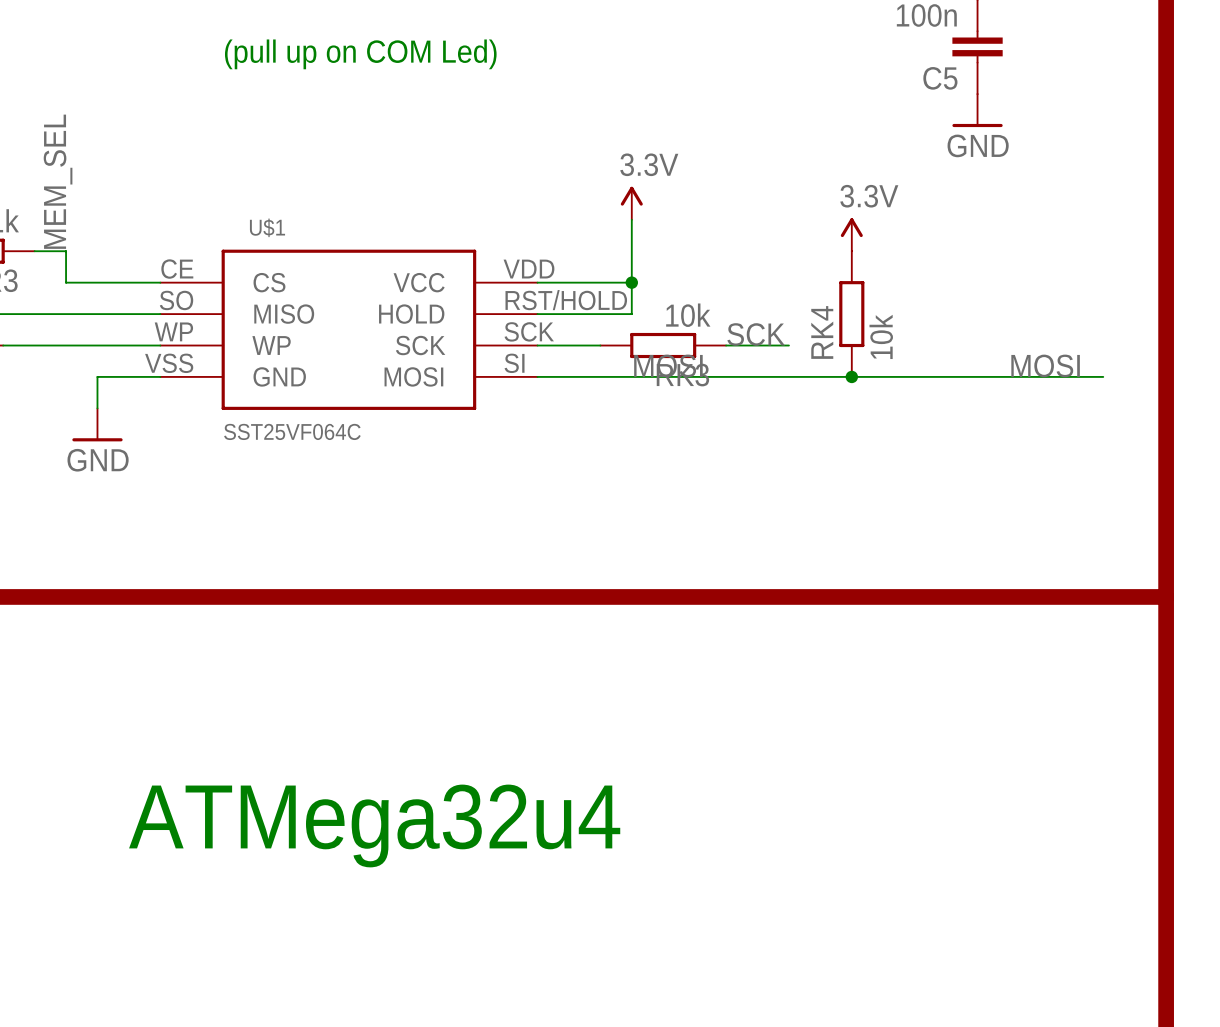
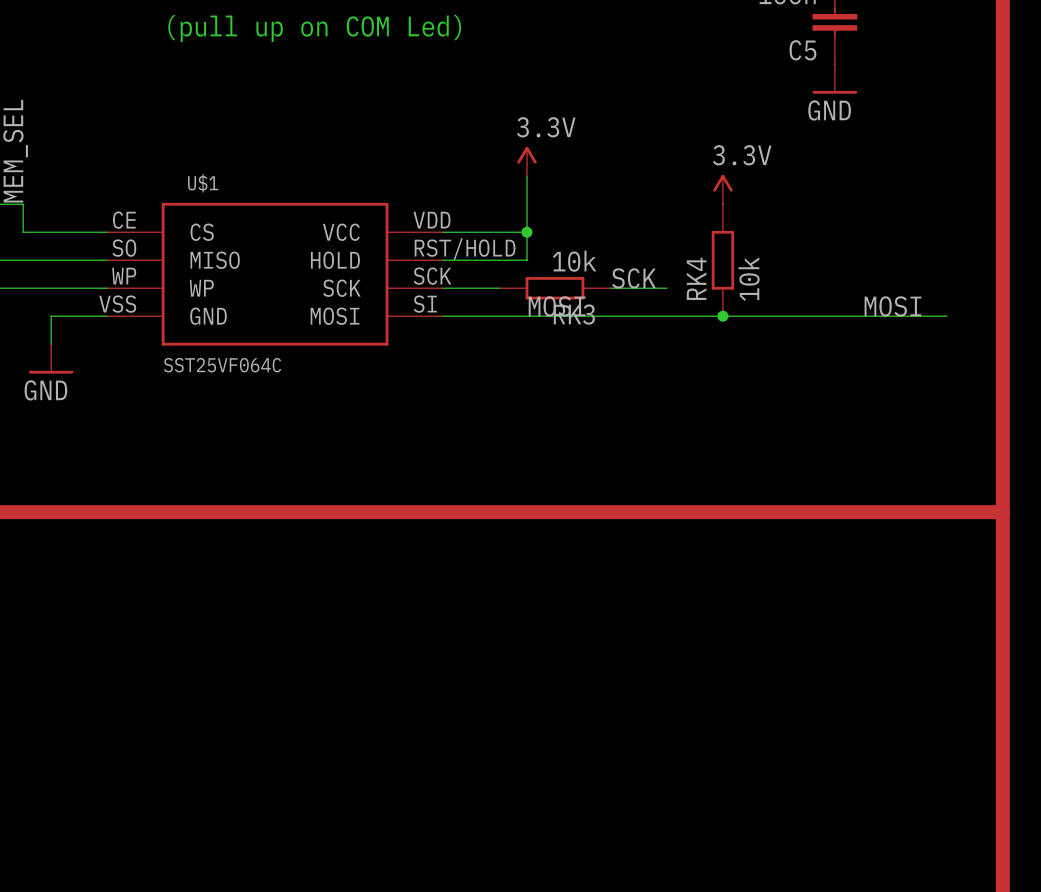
text: ATMega32u4 (374, 825) -> none

